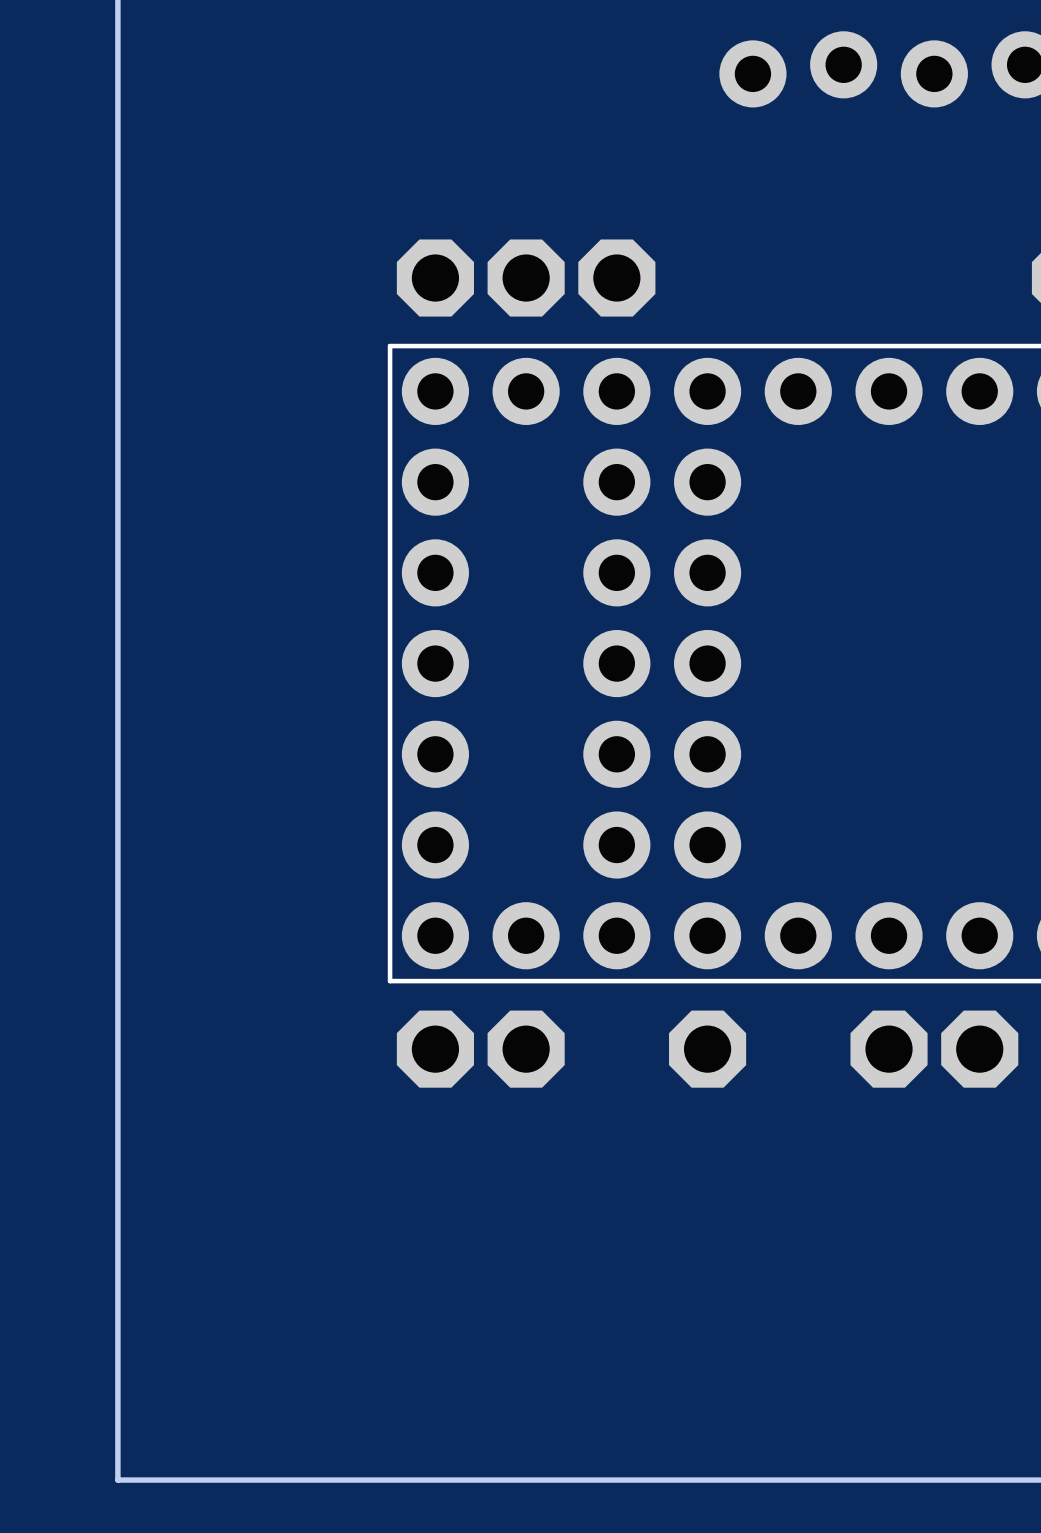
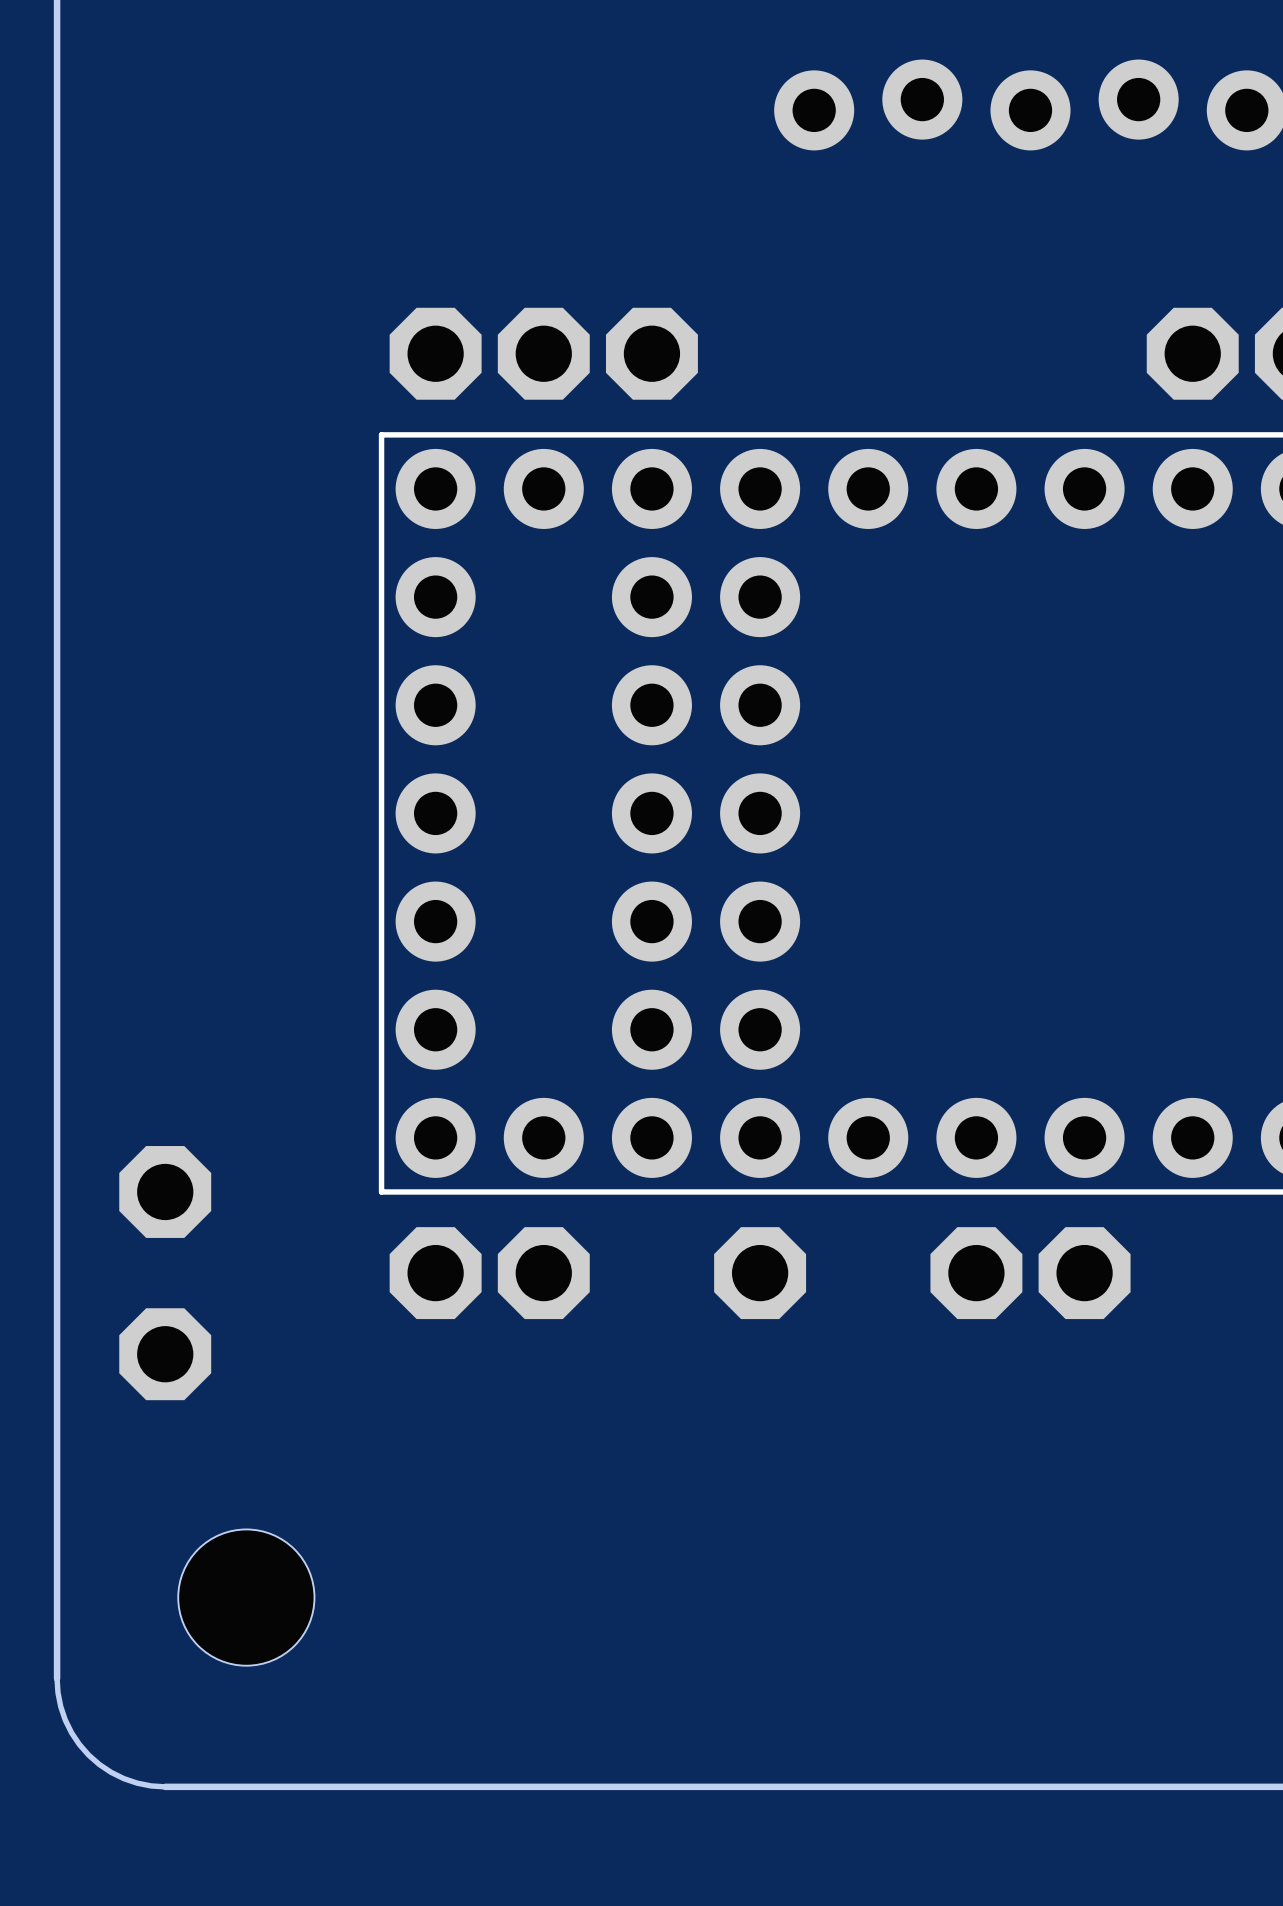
part: none -> (165, 1191)
part: none -> (165, 1354)
part: none -> (246, 1597)
board edge: (117, 1389) (117, 1480) (208, 1480) -> (57, 1678) (60, 1706) (65, 1720) (79, 1744) (88, 1755) (99, 1764) (123, 1778) (137, 1783) (165, 1786)

